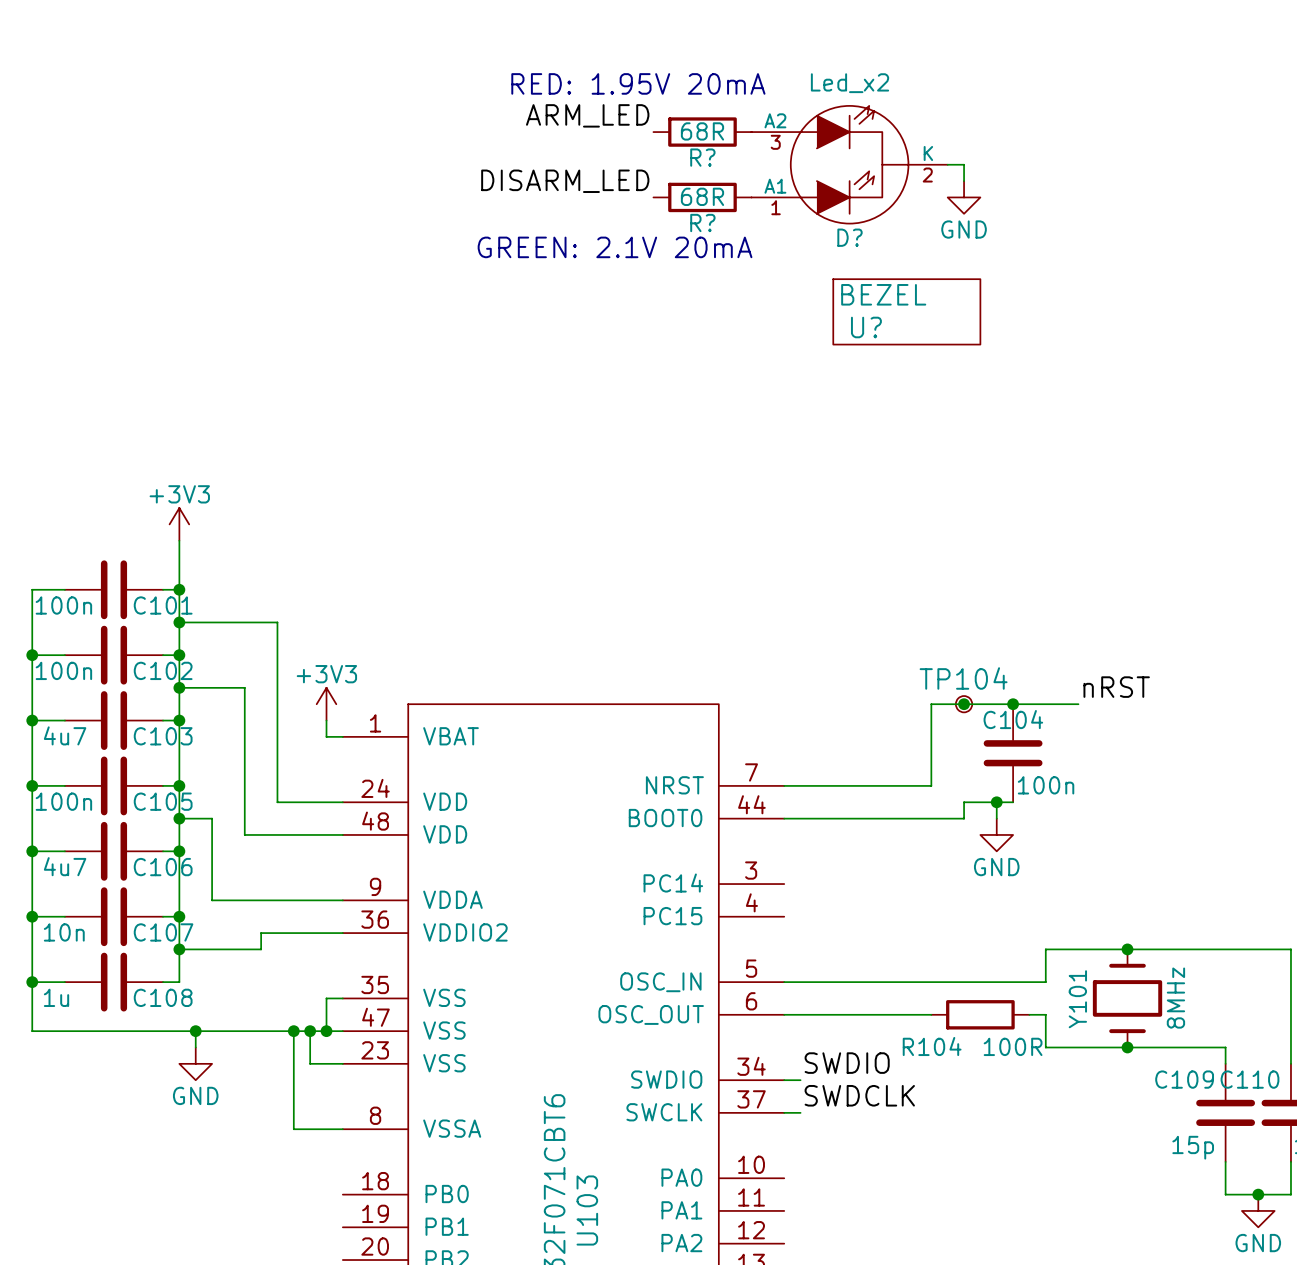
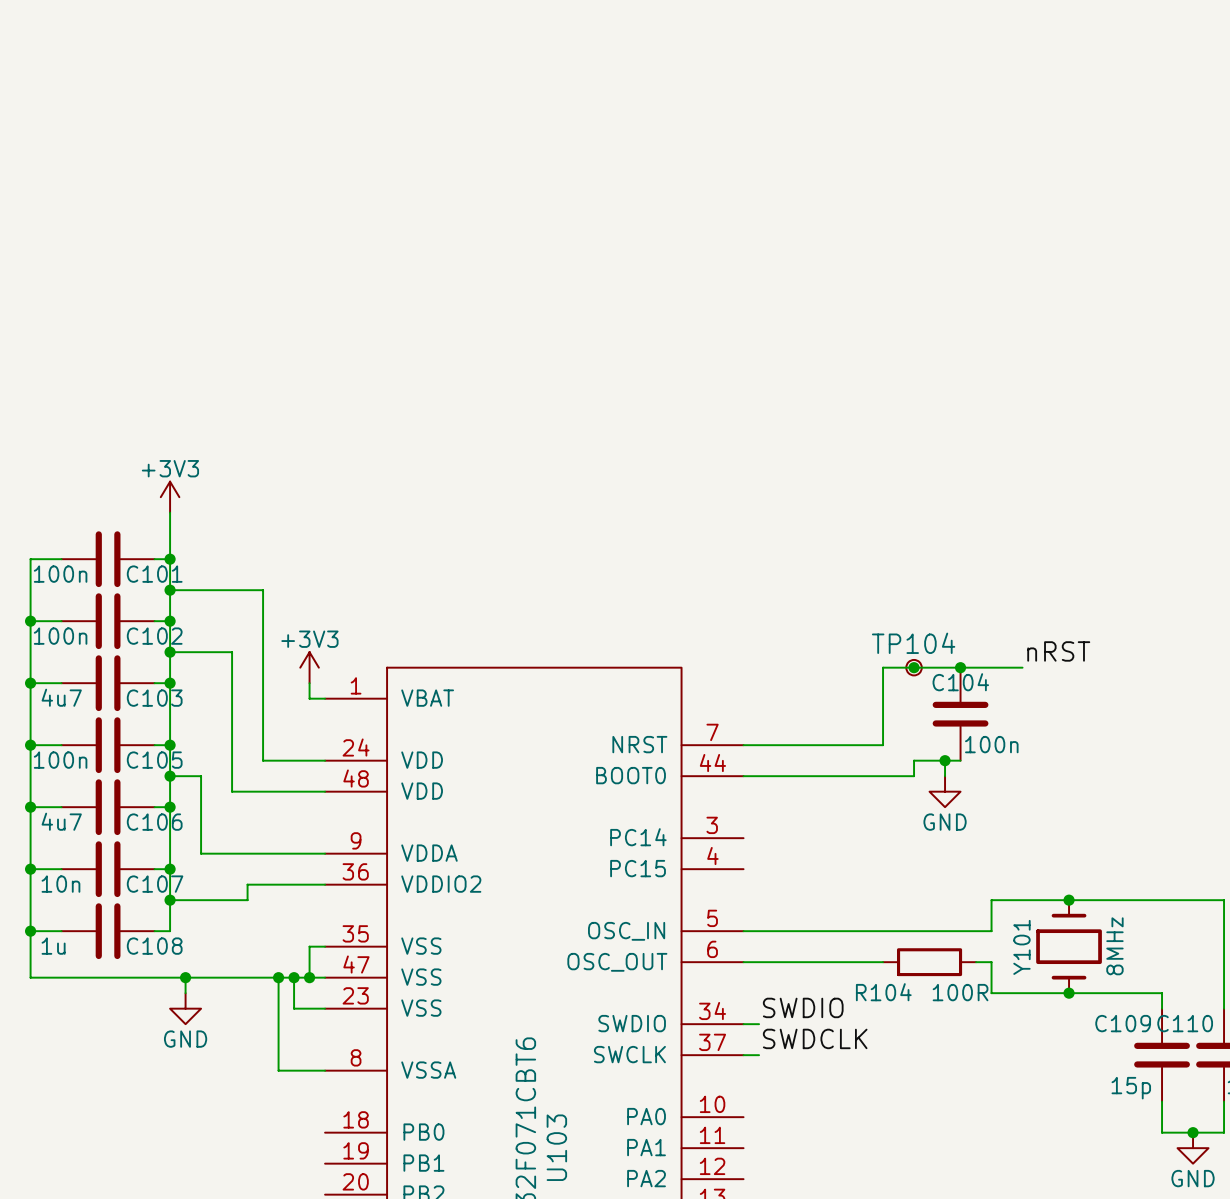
text: RED: 1.95V 20mA (638, 83) -> none
label: ARM_LED (587, 115) -> none
R?: 68R (702, 132) -> none
D?: Led_x2 (849, 164) -> none
wire: (947, 164) (964, 164) (964, 181) -> none
label: DISARM_LED (565, 181) -> none
R?: 68R (702, 197) -> none
power symbol: GND (964, 197) -> none
text: GREEN: 2.1V 20mA (615, 247) -> none
U?: BEZEL (906, 311) -> none

